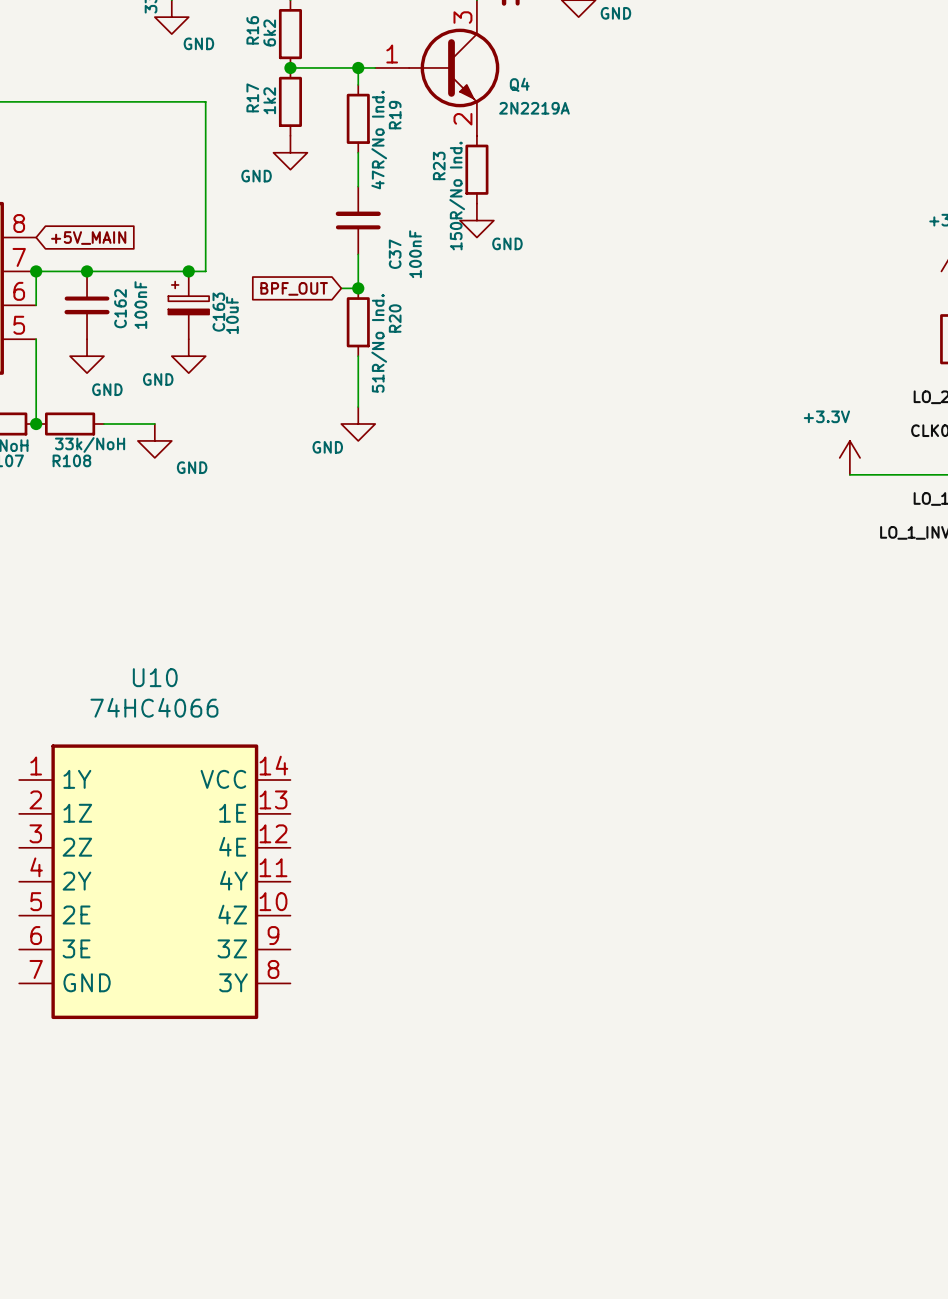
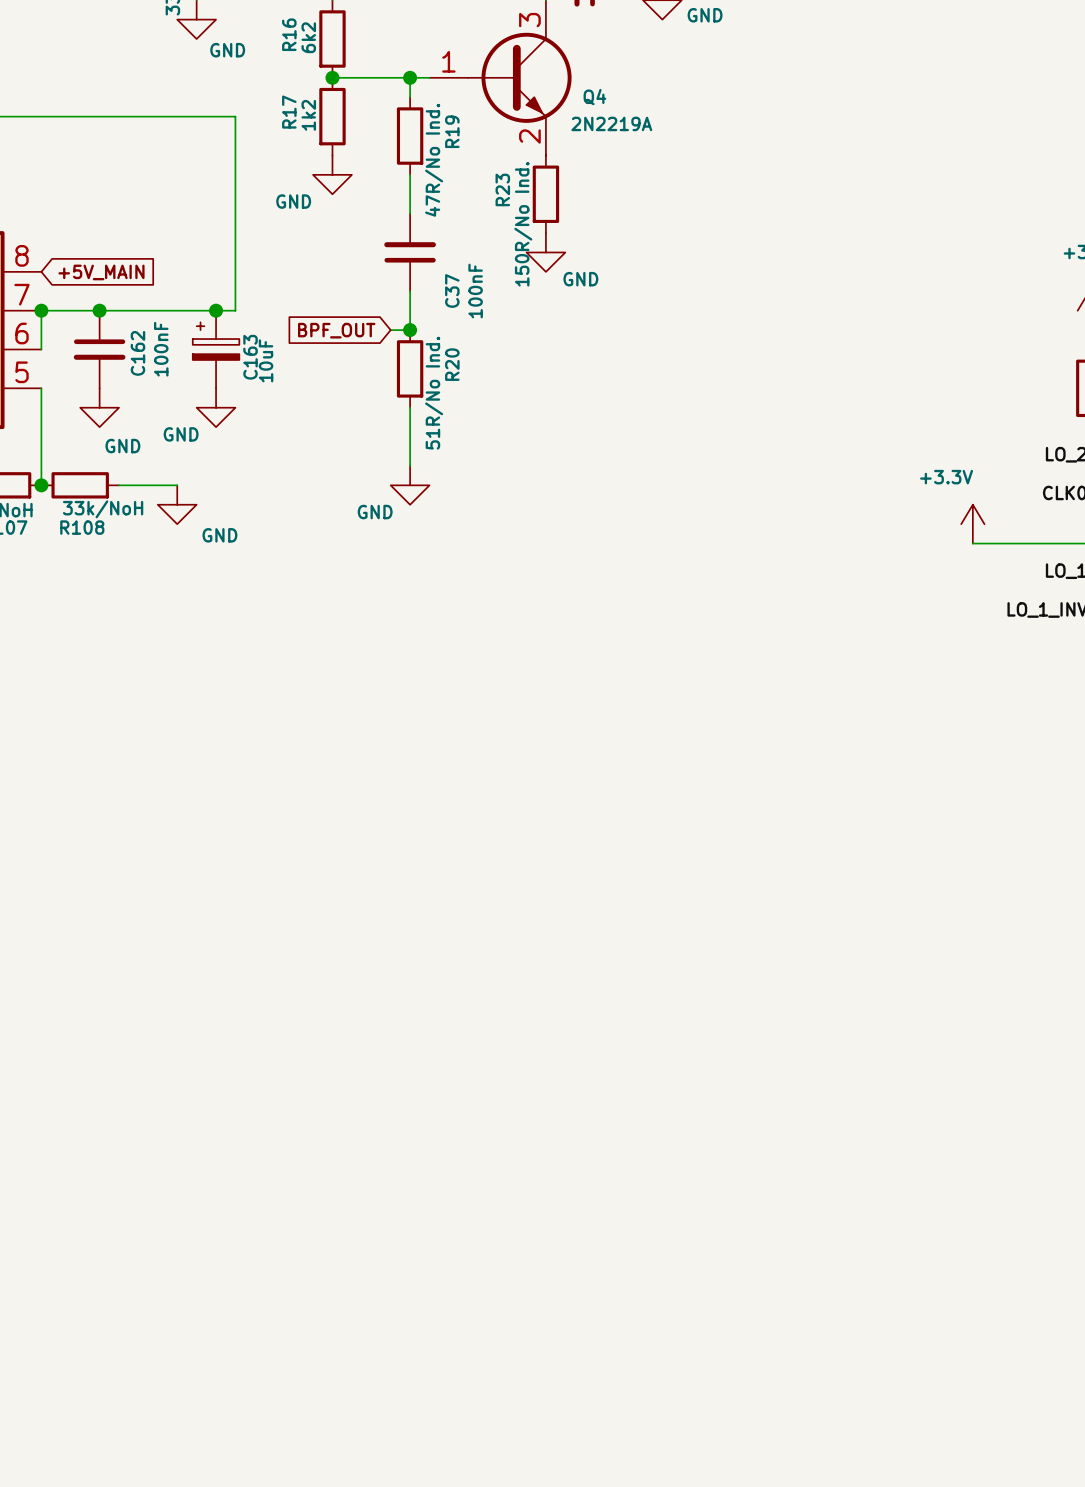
U10: 74HC4066 (154, 881) -> none

